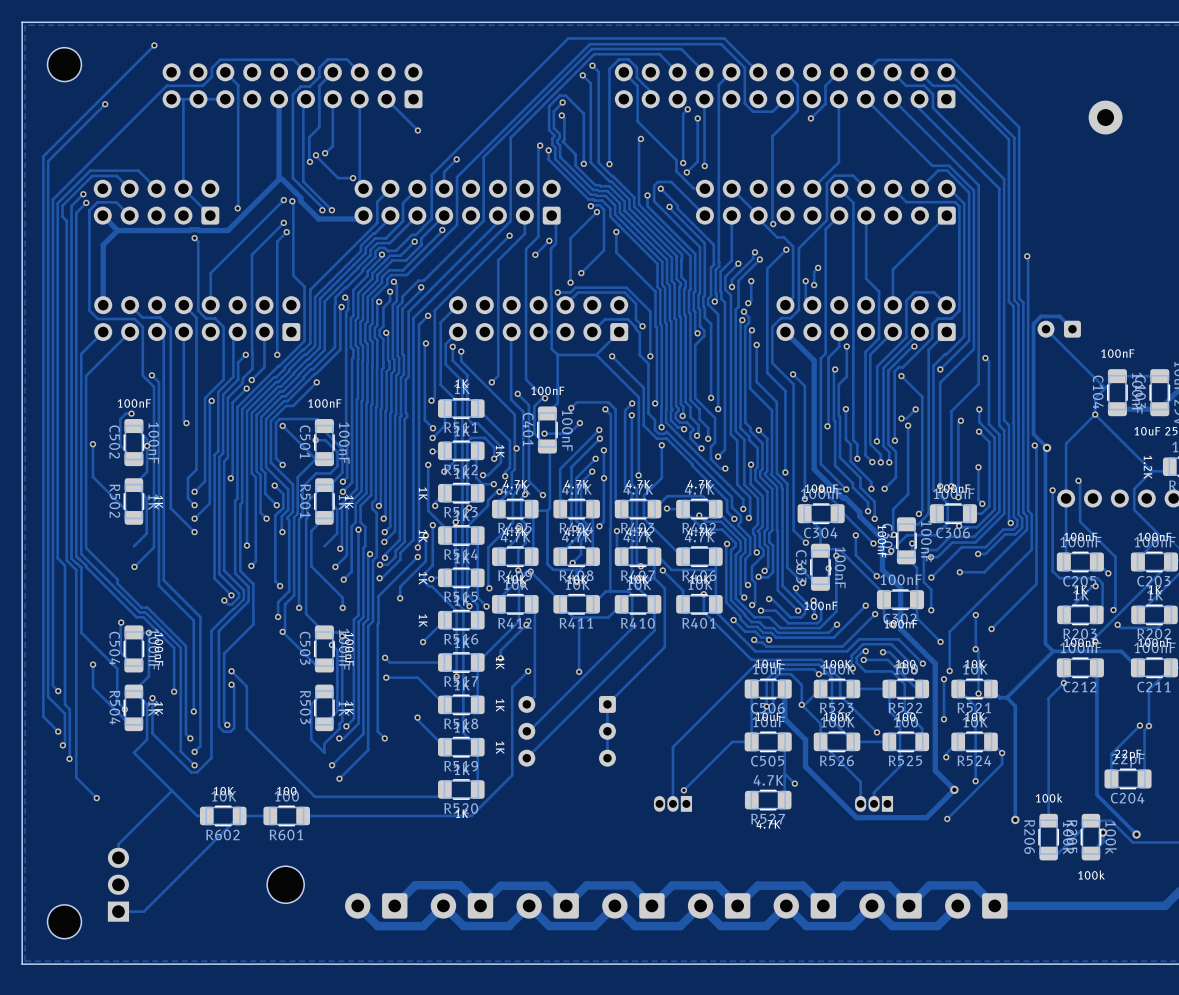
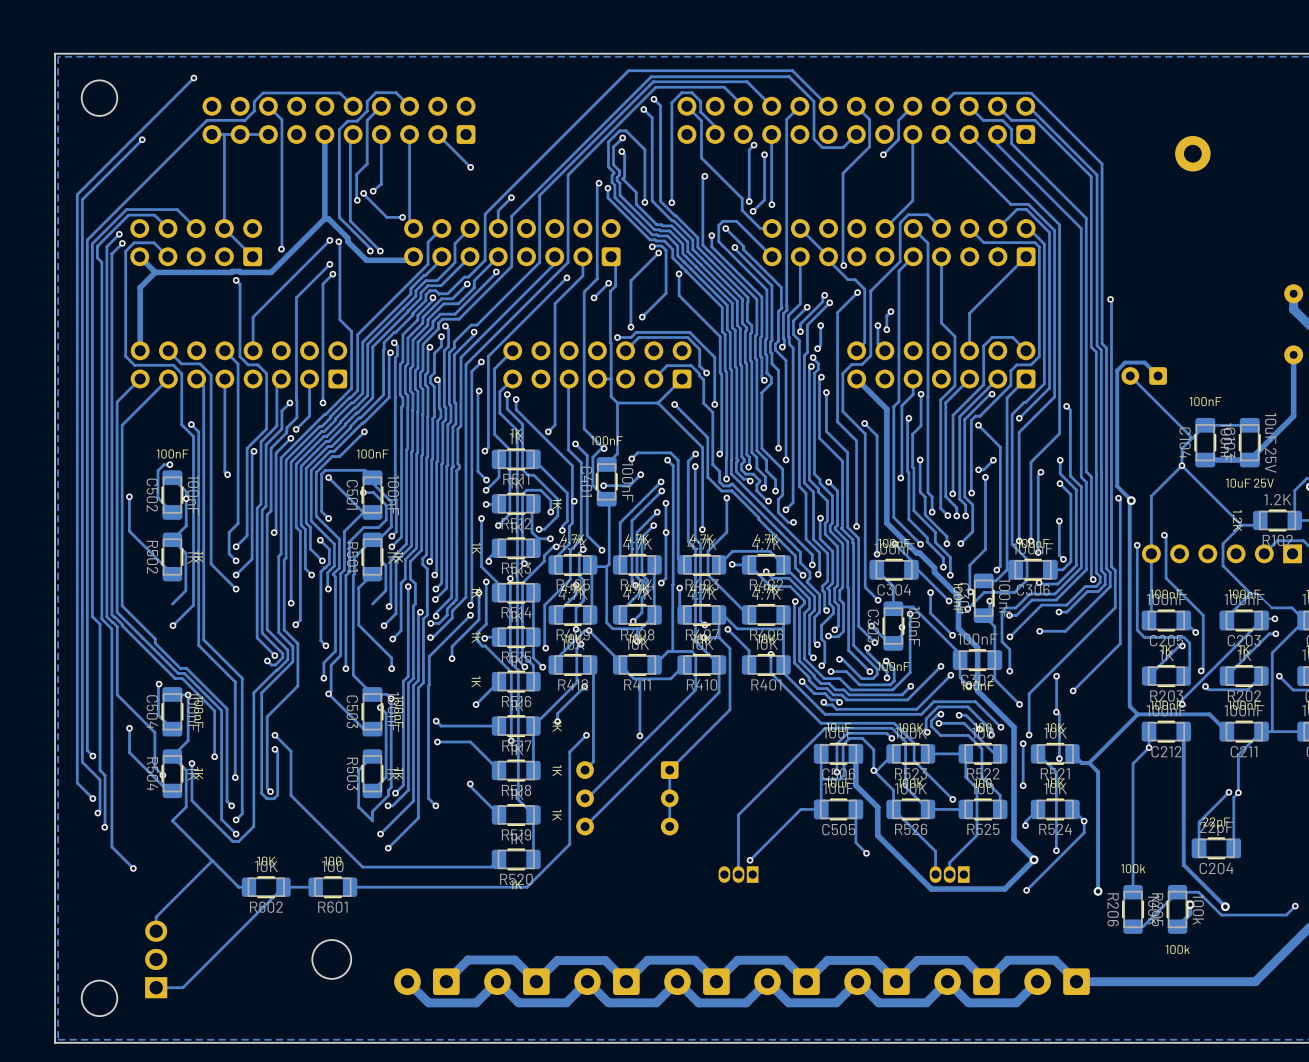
track: (784, 773) (784, 800) -> none
R527: 4.7K (768, 800) -> none

